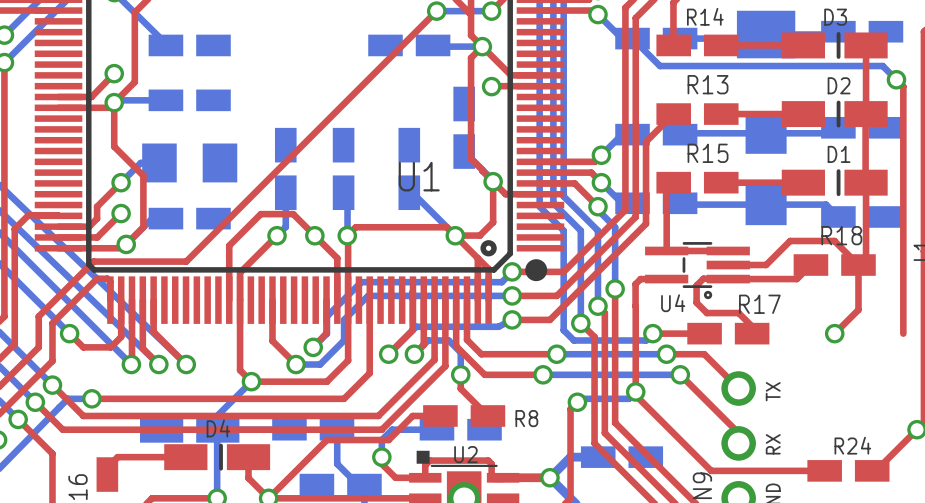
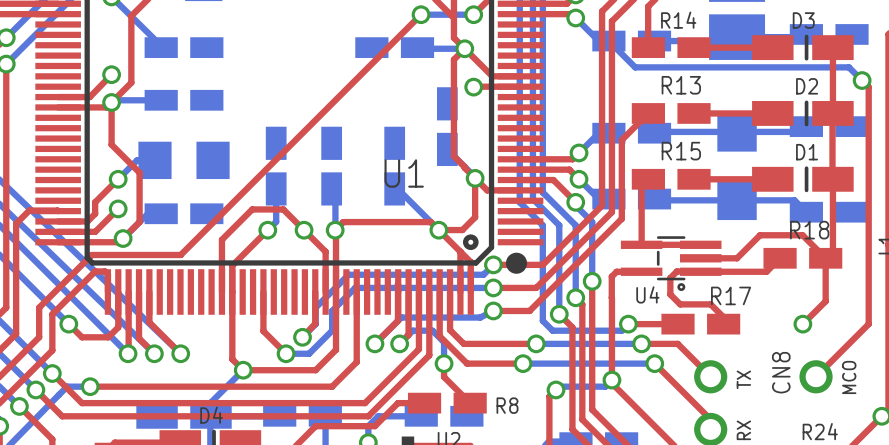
top track: none -> (868, 324) (816, 376)
CN8: none -> (816, 376)

